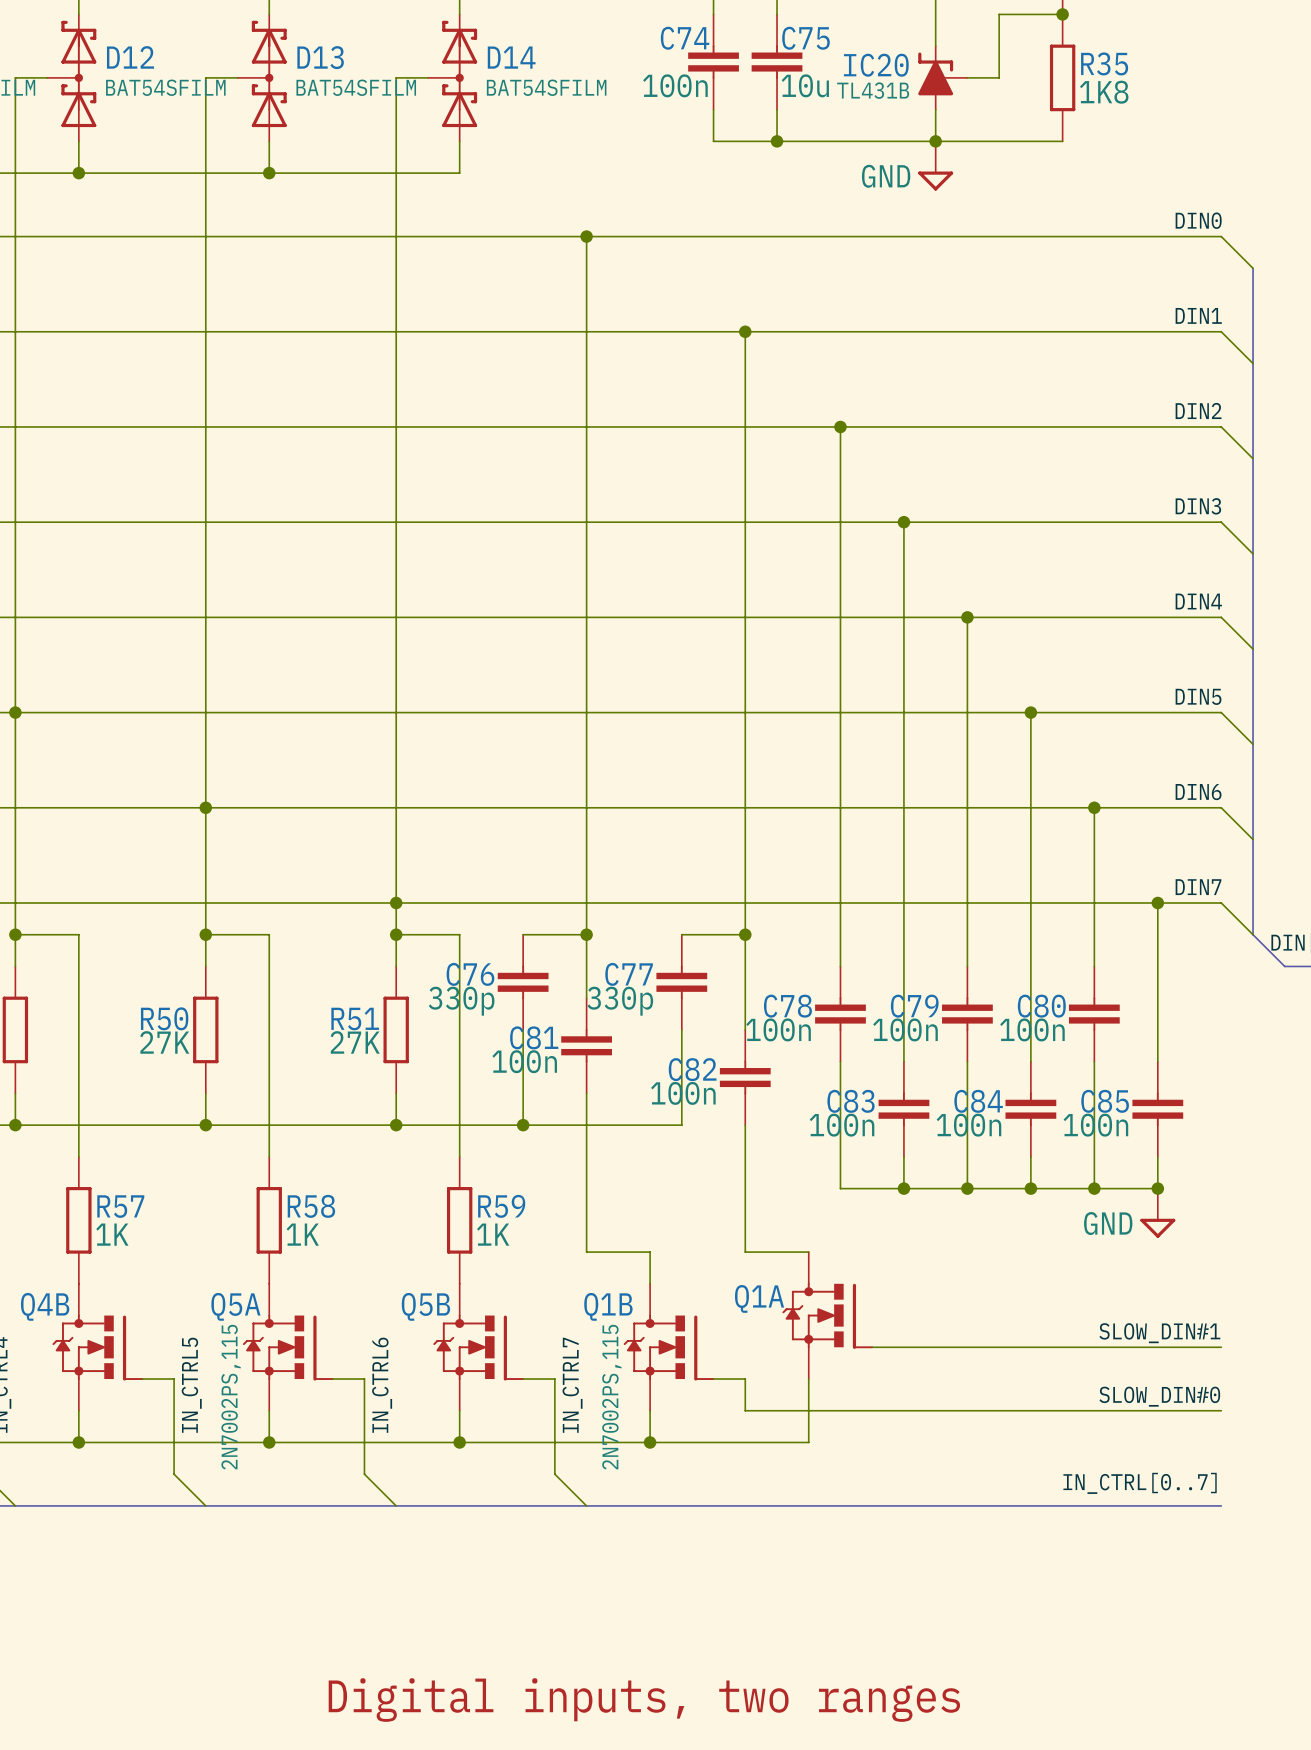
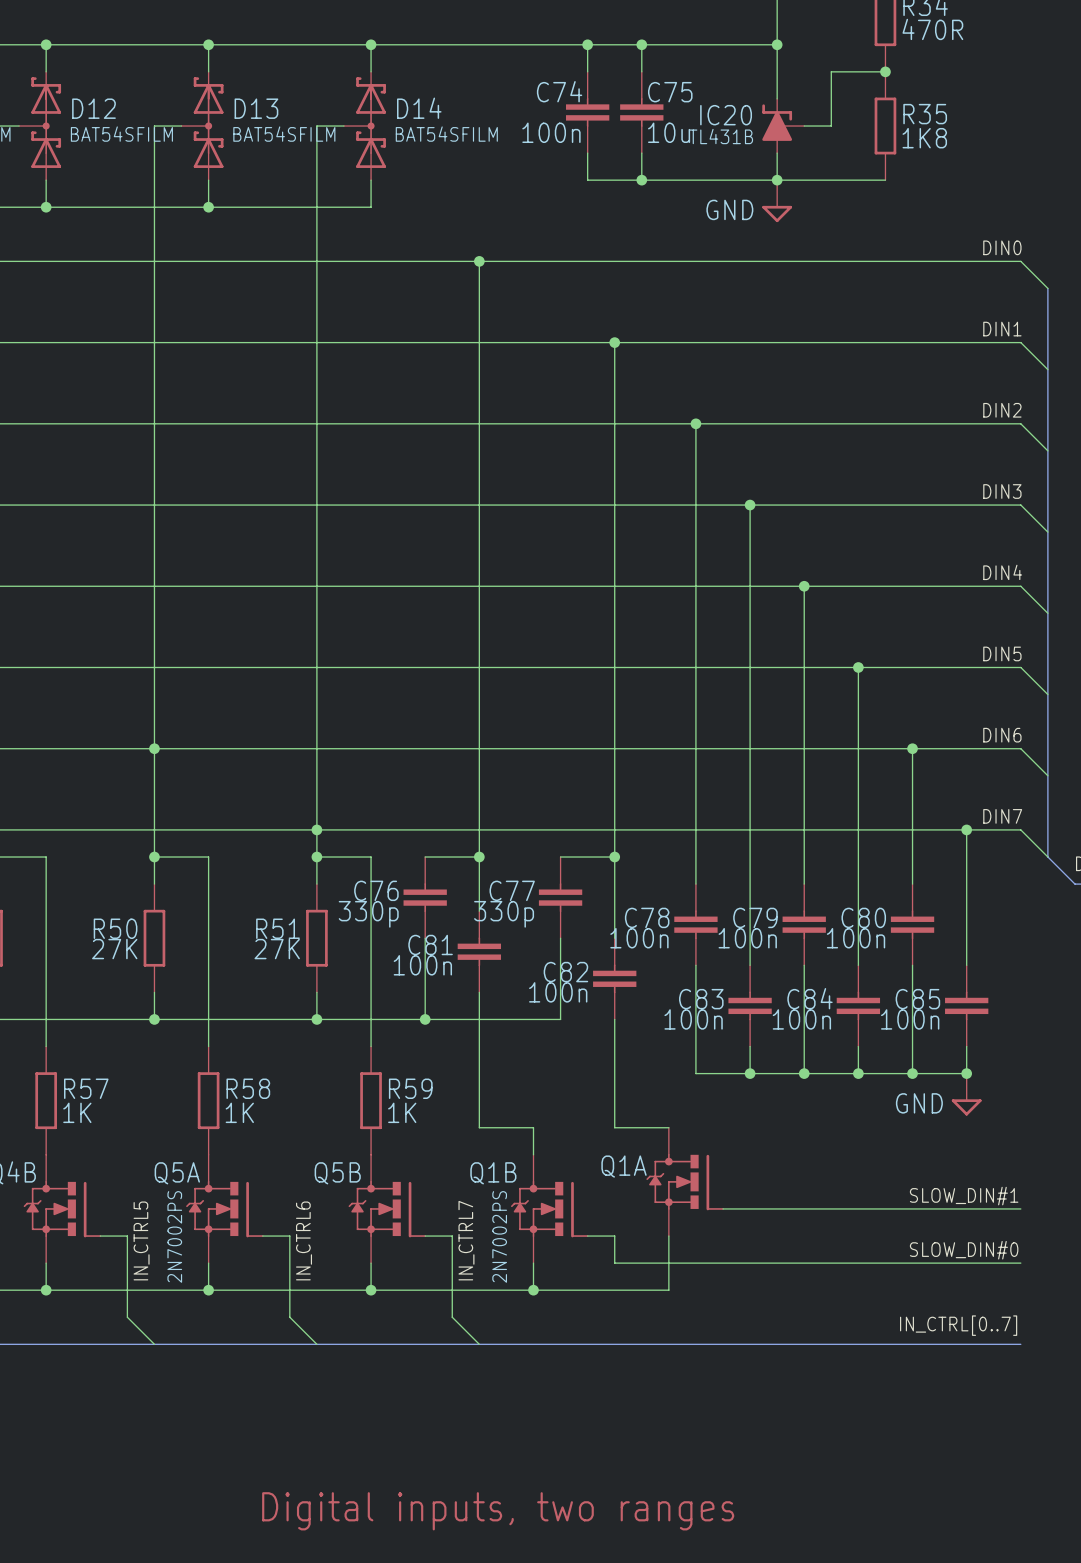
Q5A value: 2N7002PS,115 (231, 1397) -> 2N7002PS (174, 1236)
Q1B value: 2N7002PS,115 (611, 1397) -> 2N7002PS (499, 1236)

